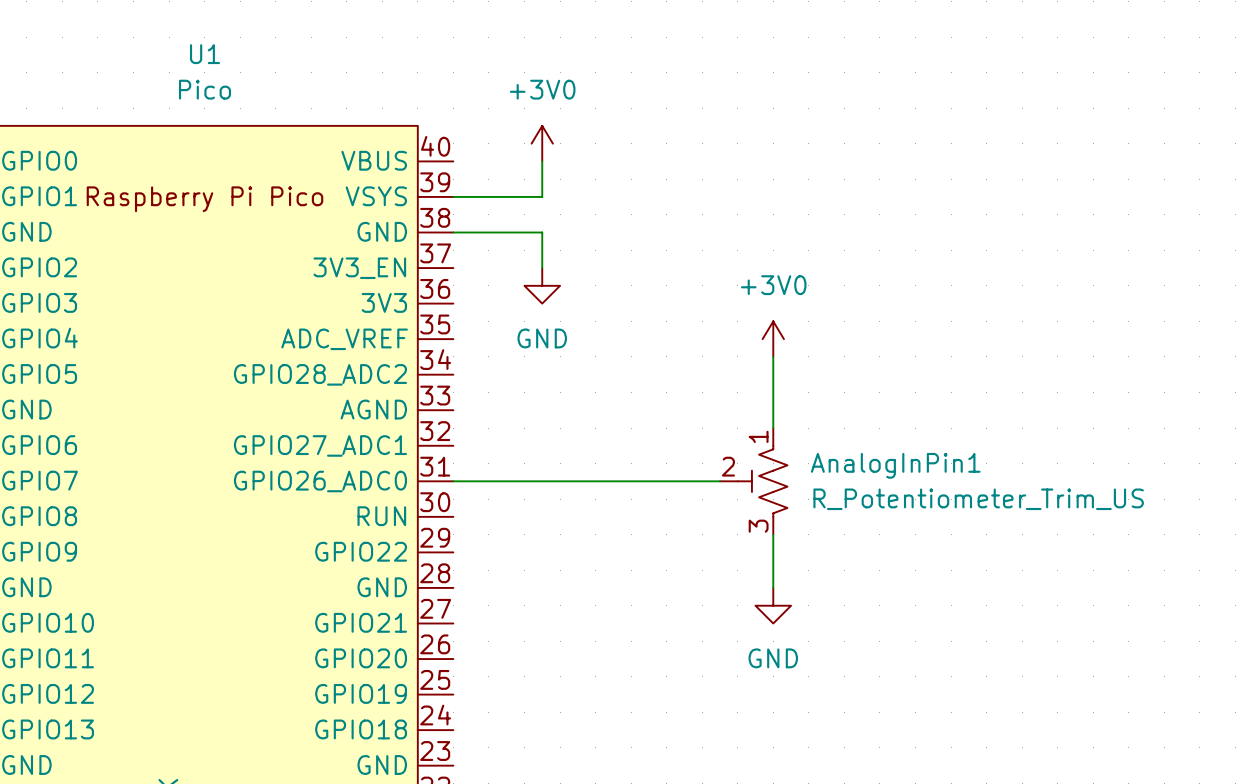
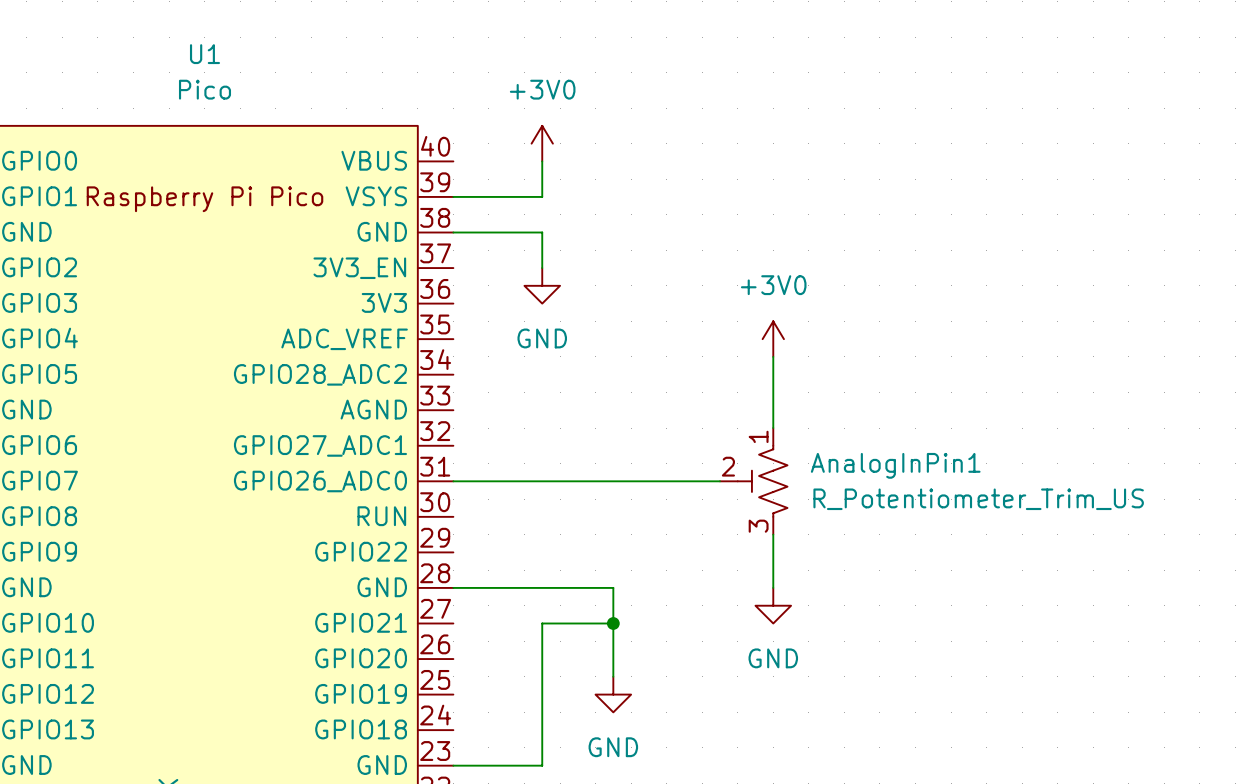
wire: none -> (453, 587) (613, 587) (613, 676)
wire: none -> (613, 623) (542, 623) (542, 765) (453, 765)
junction: none -> (613, 623)
power symbol: none -> GND (613, 694)

